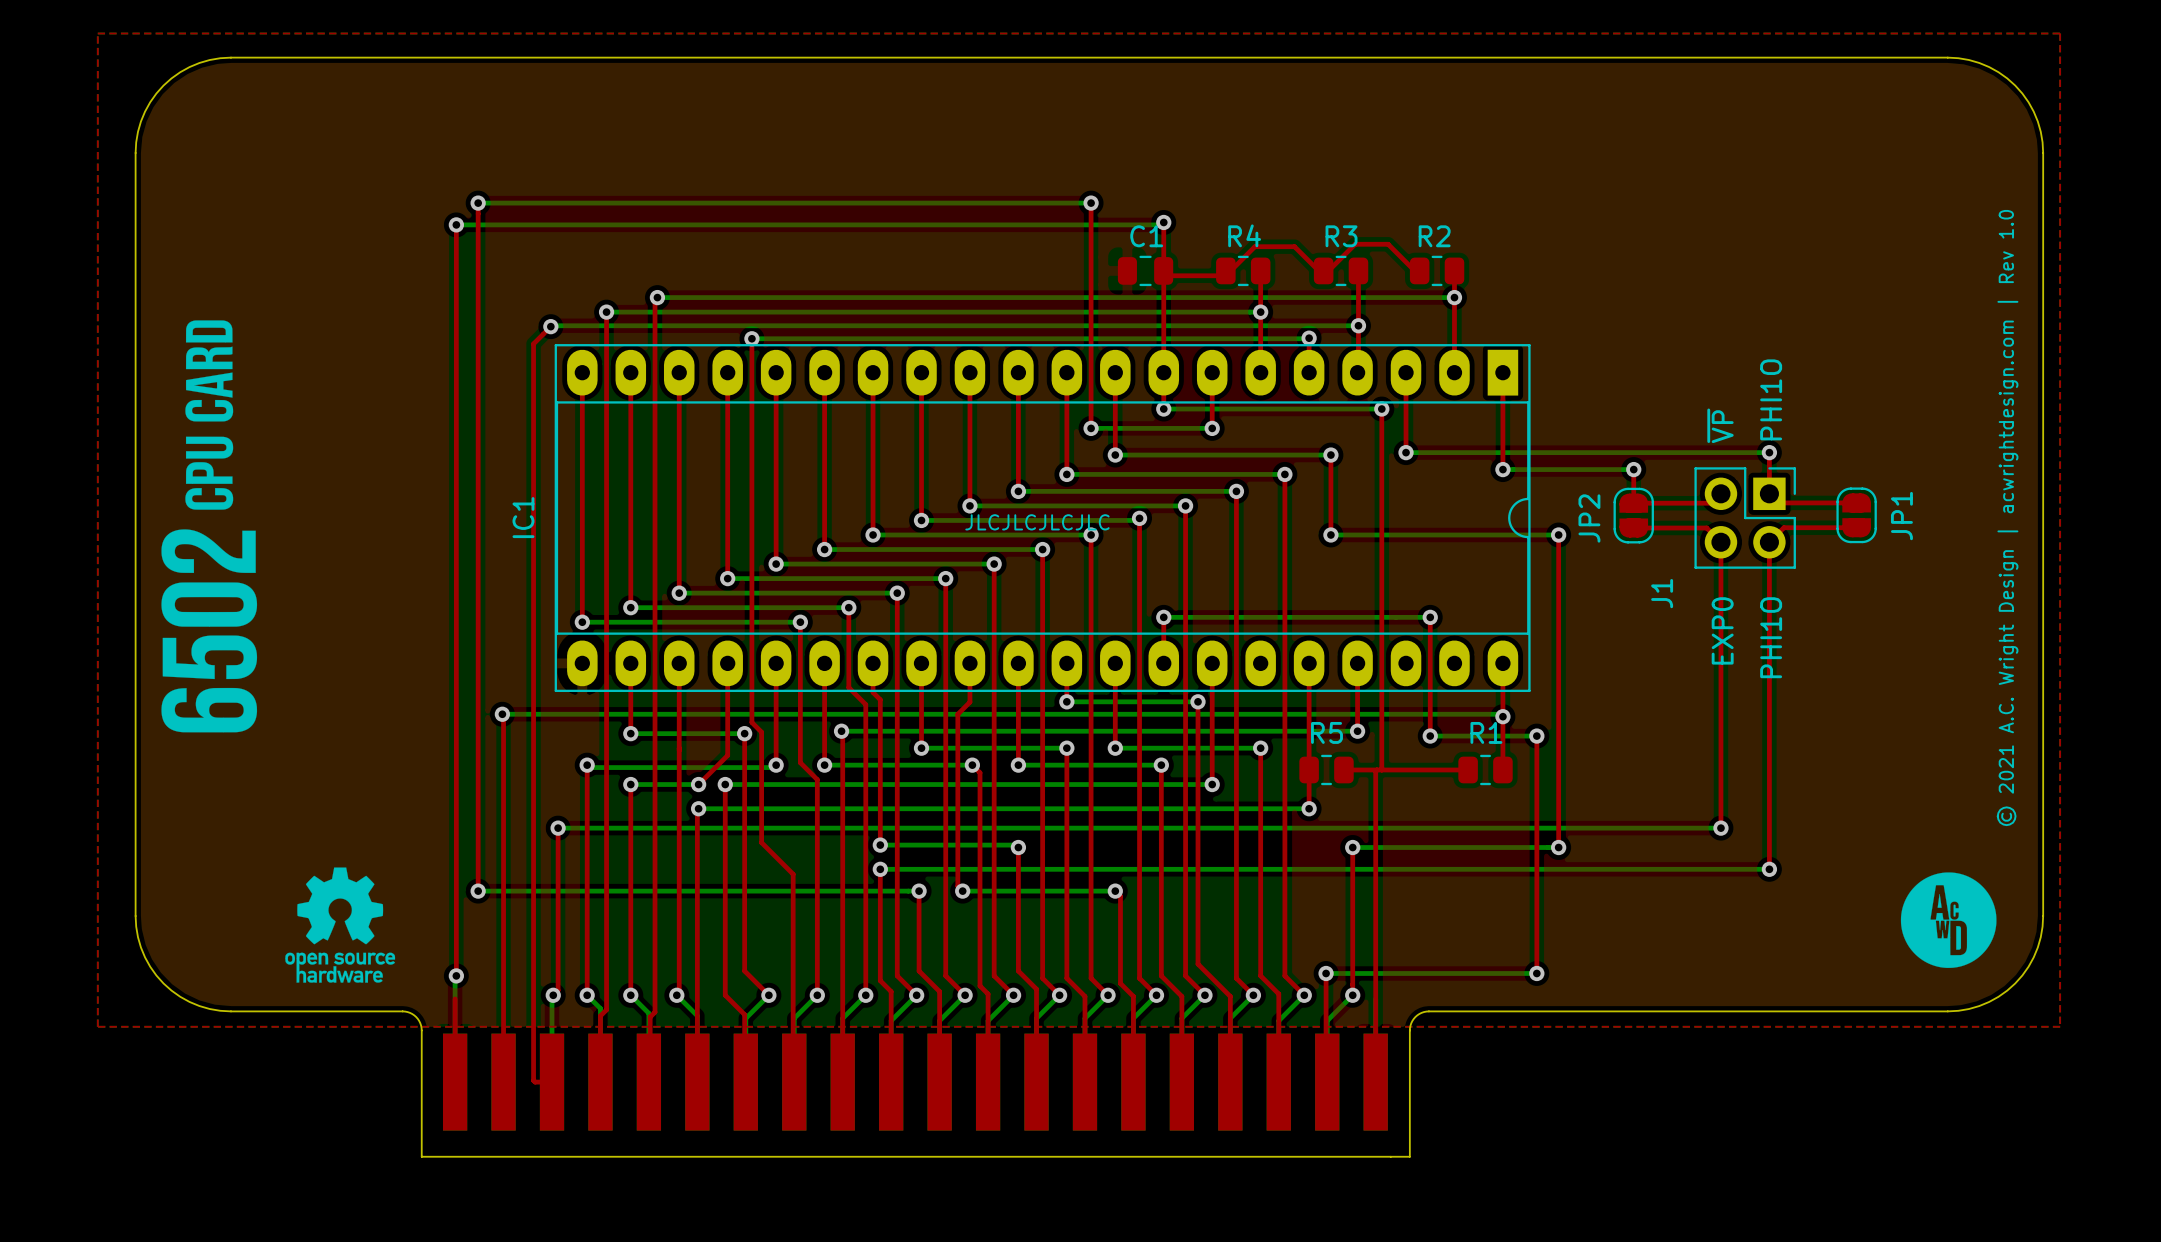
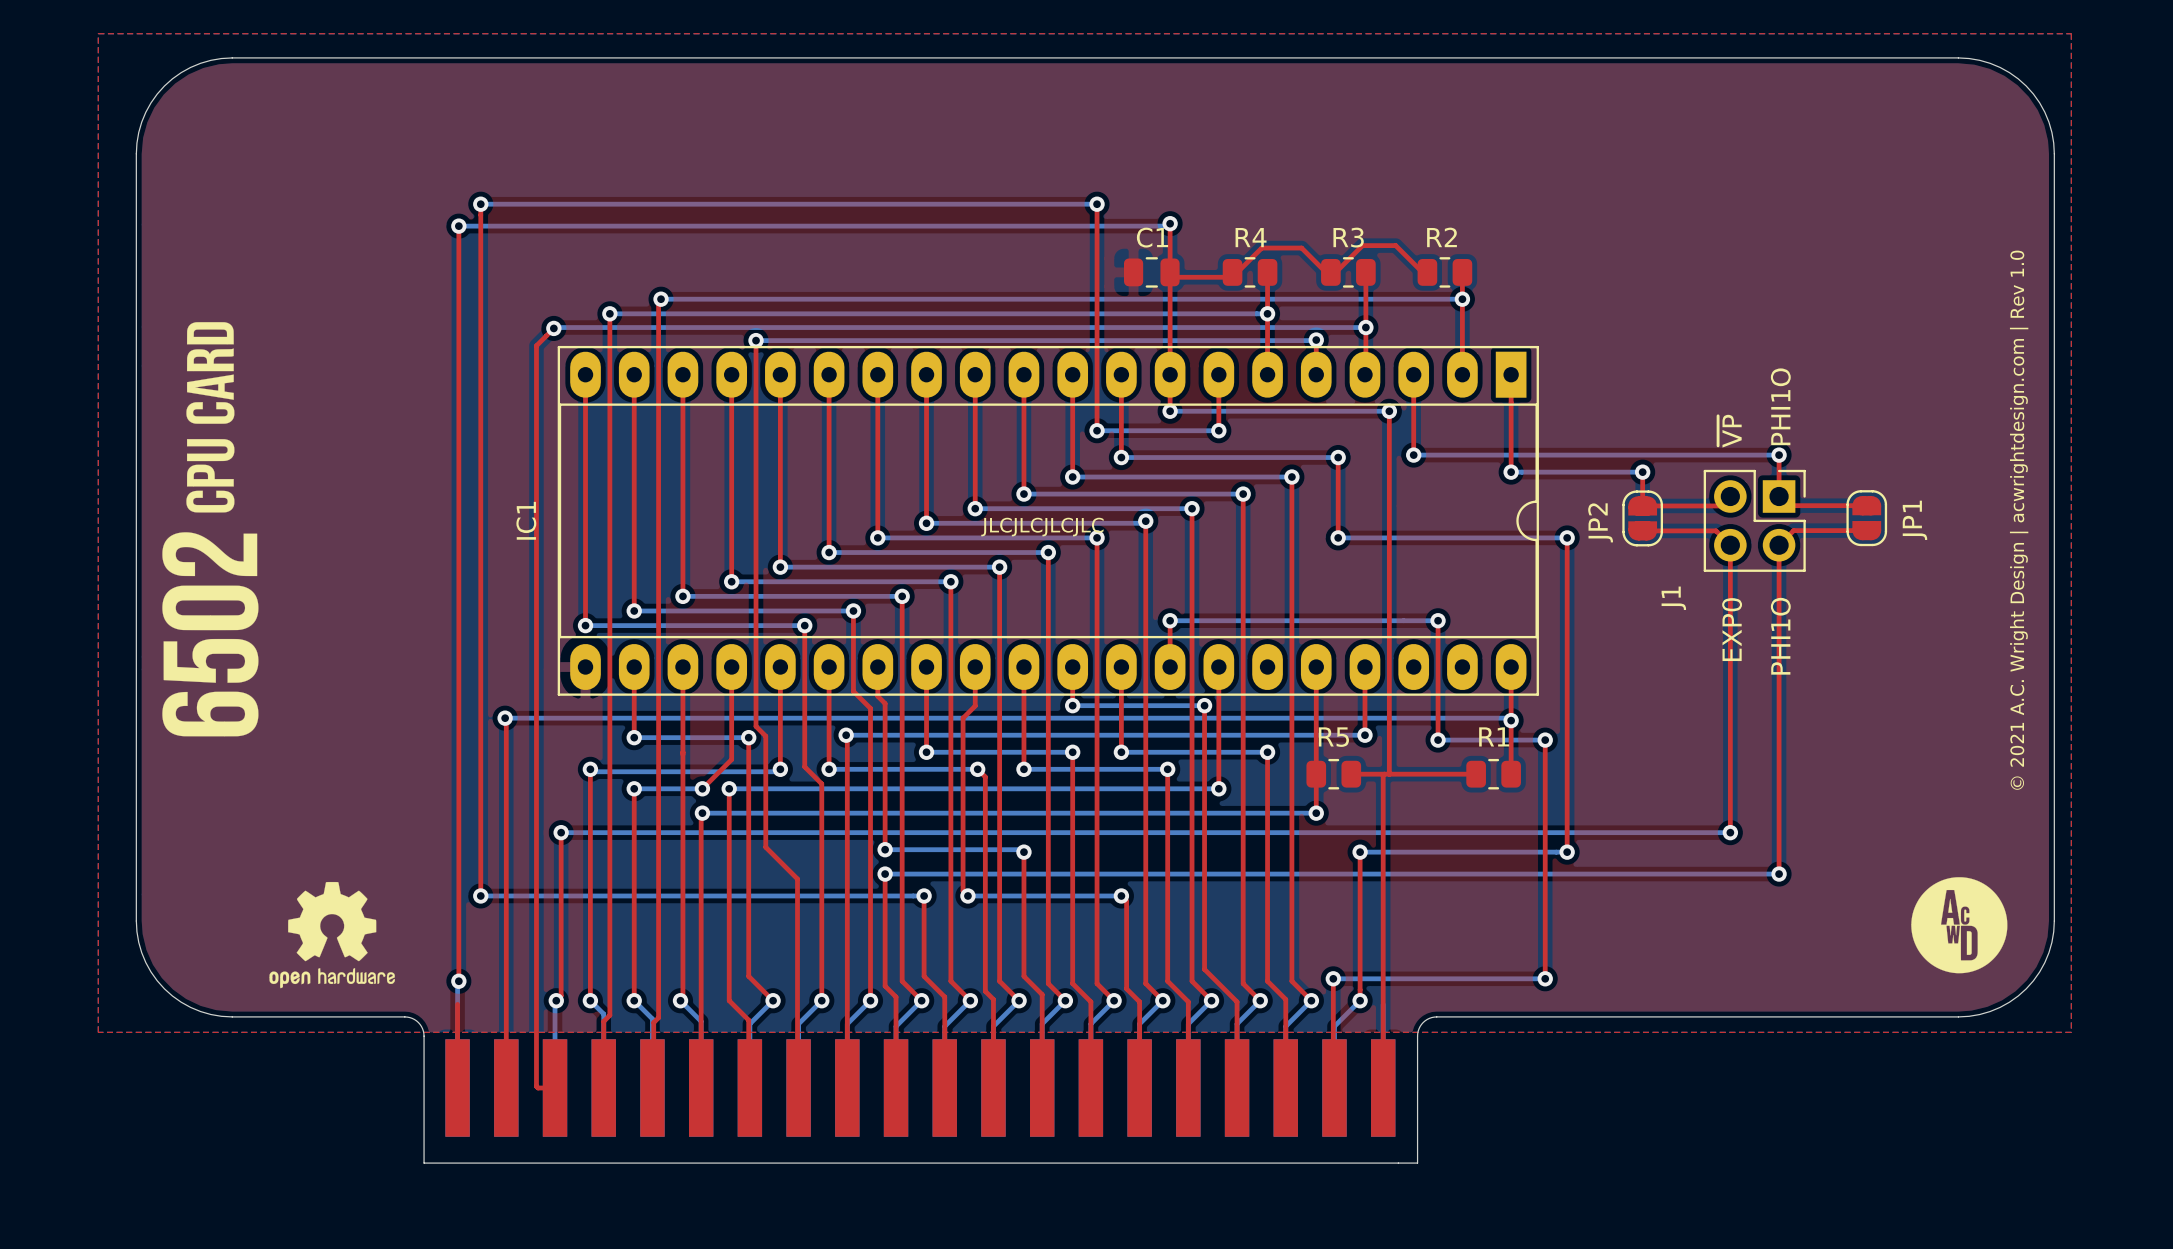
drawing shape: [285, 867, 396, 983] -> [269, 881, 395, 989]

